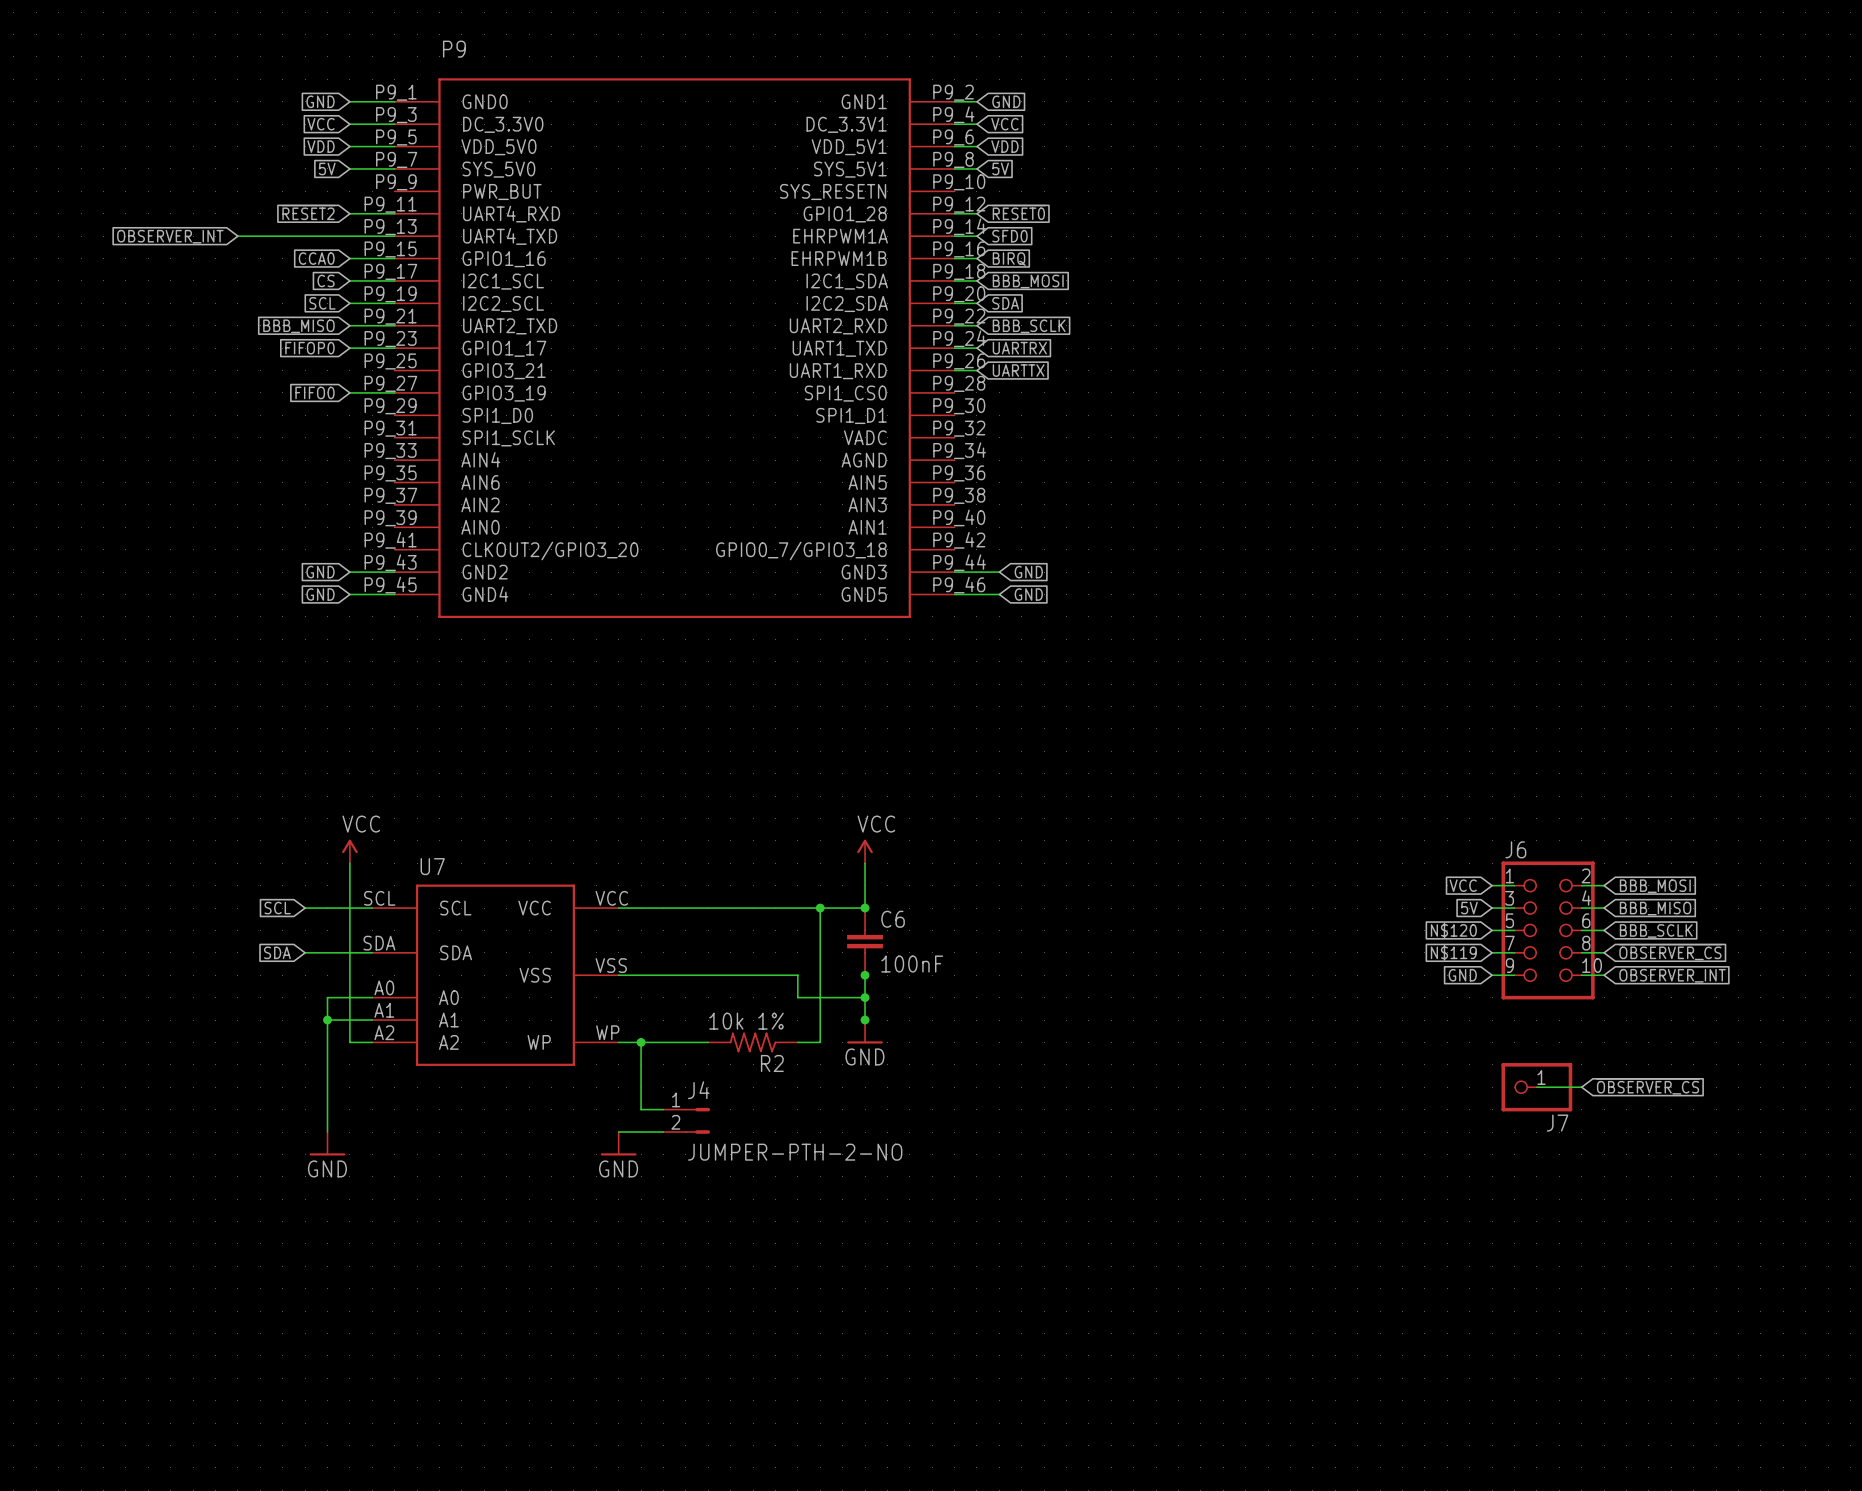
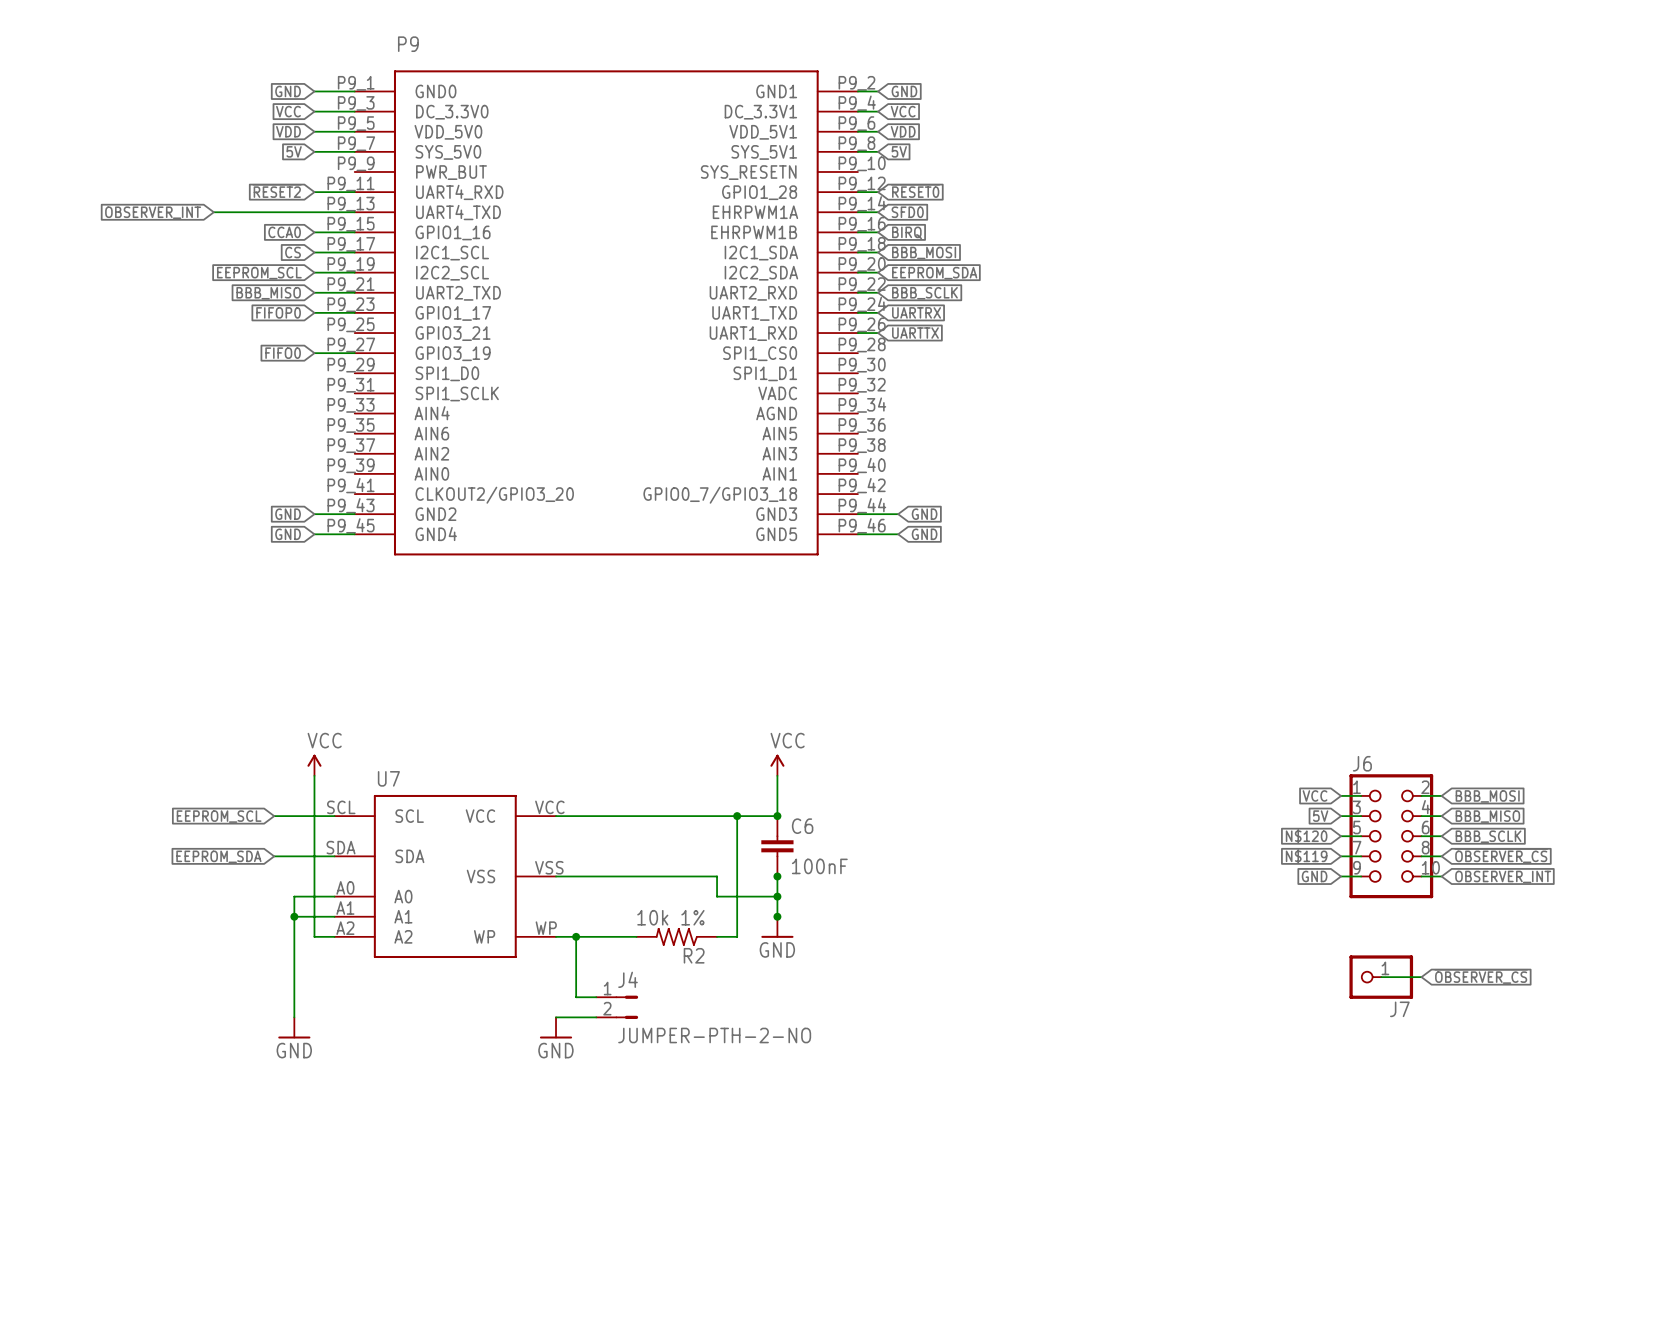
global label: SCL (322, 303) -> EEPROM_SCL (259, 273)
global label: SDA (1005, 303) -> EEPROM_SDA (934, 273)
global label: SCL (277, 908) -> EEPROM_SCL (219, 816)
global label: SDA (277, 952) -> EEPROM_SDA (218, 856)

